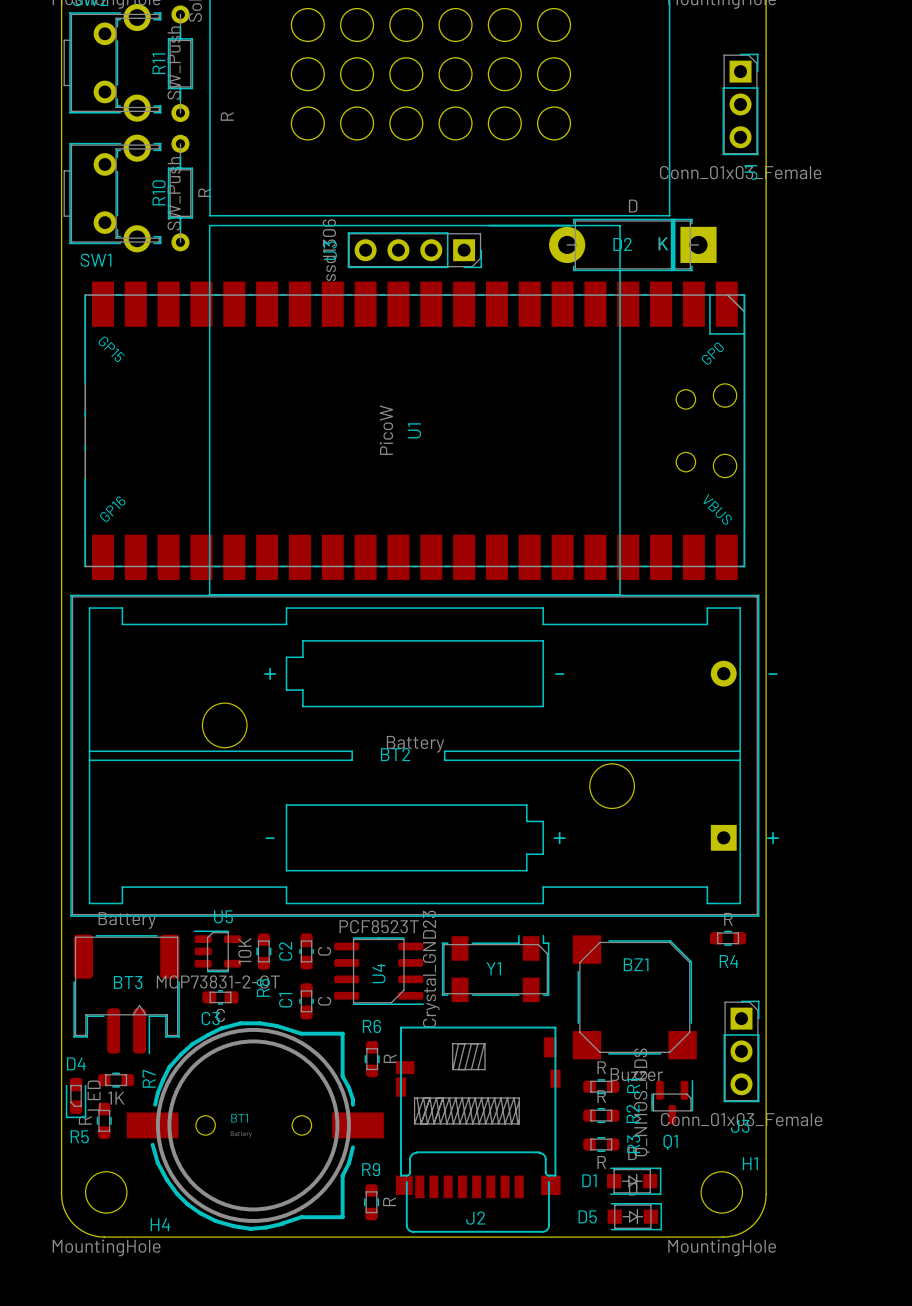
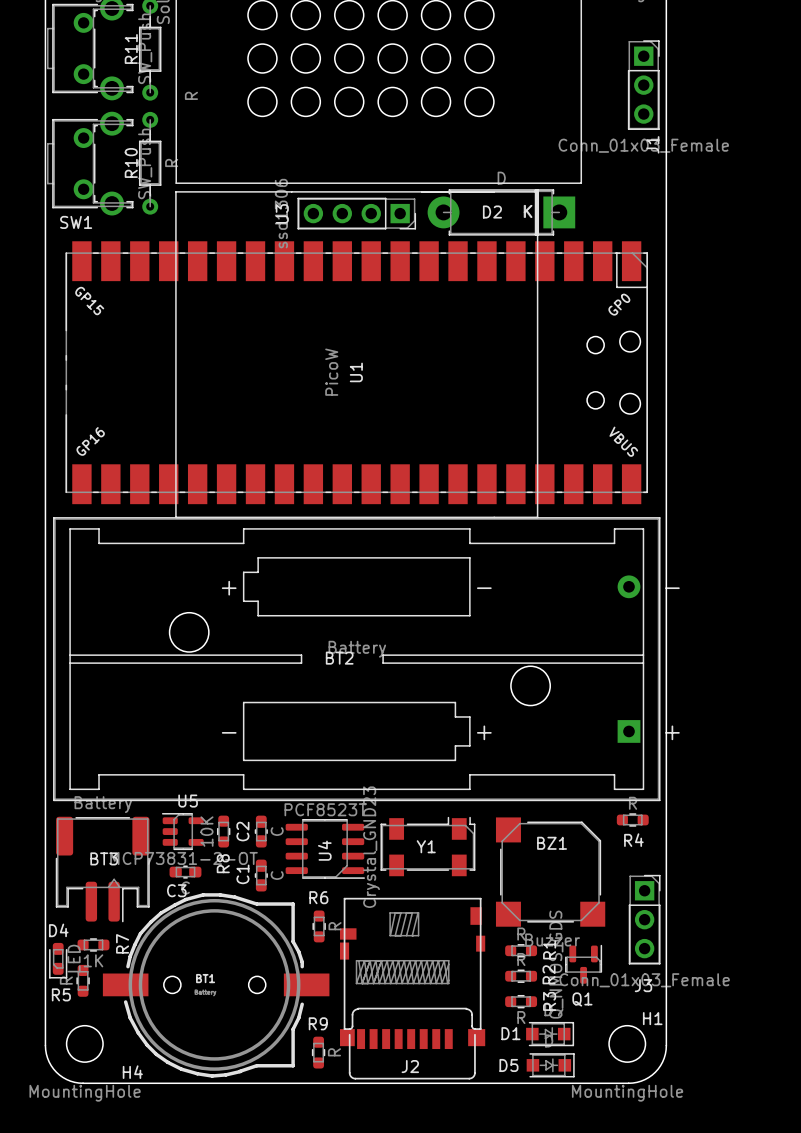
D2 position: (632, 244) -> (501, 212)

